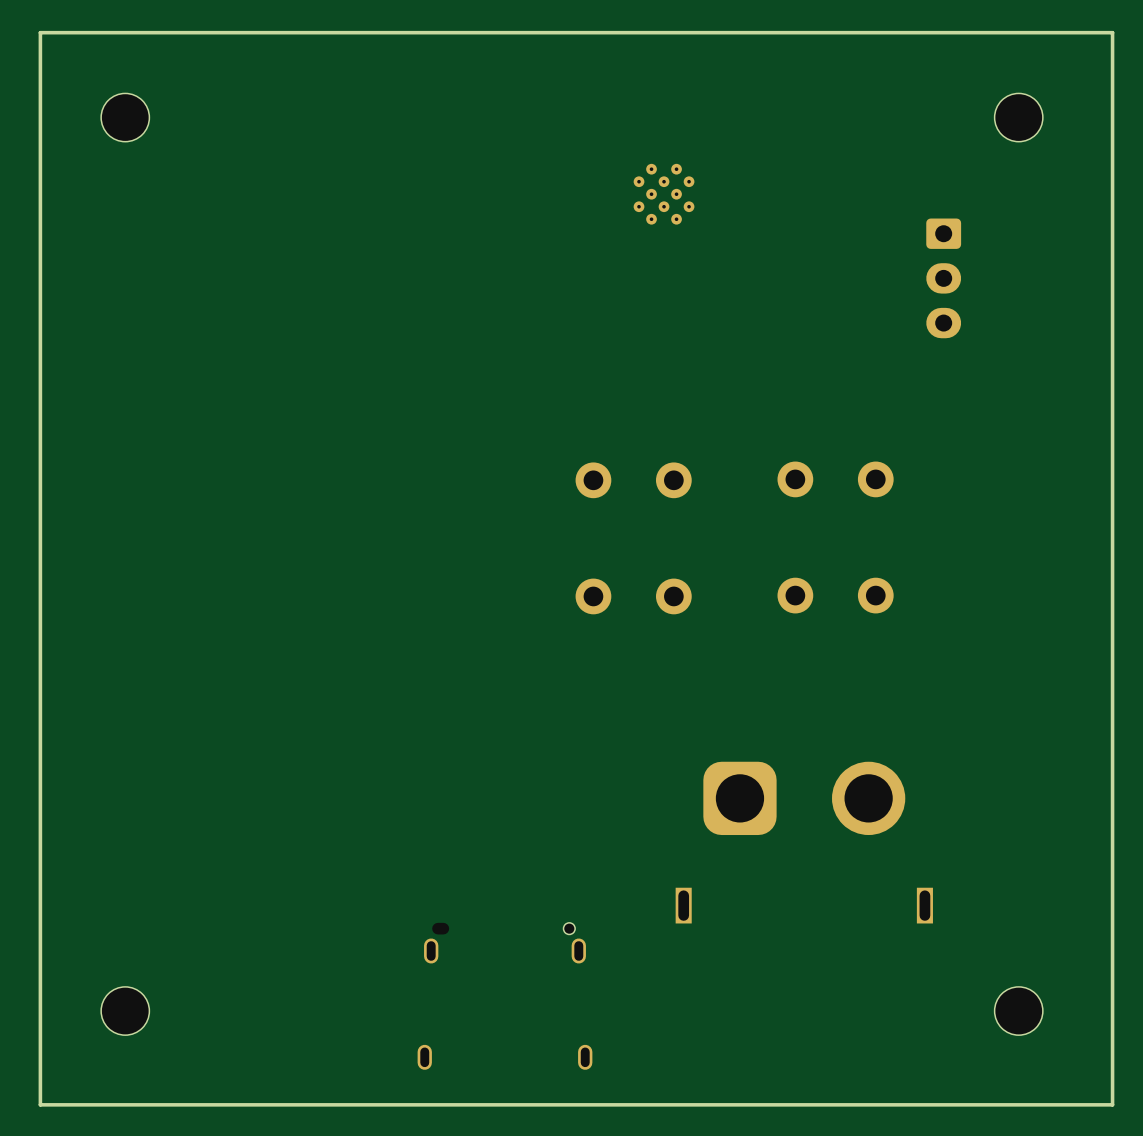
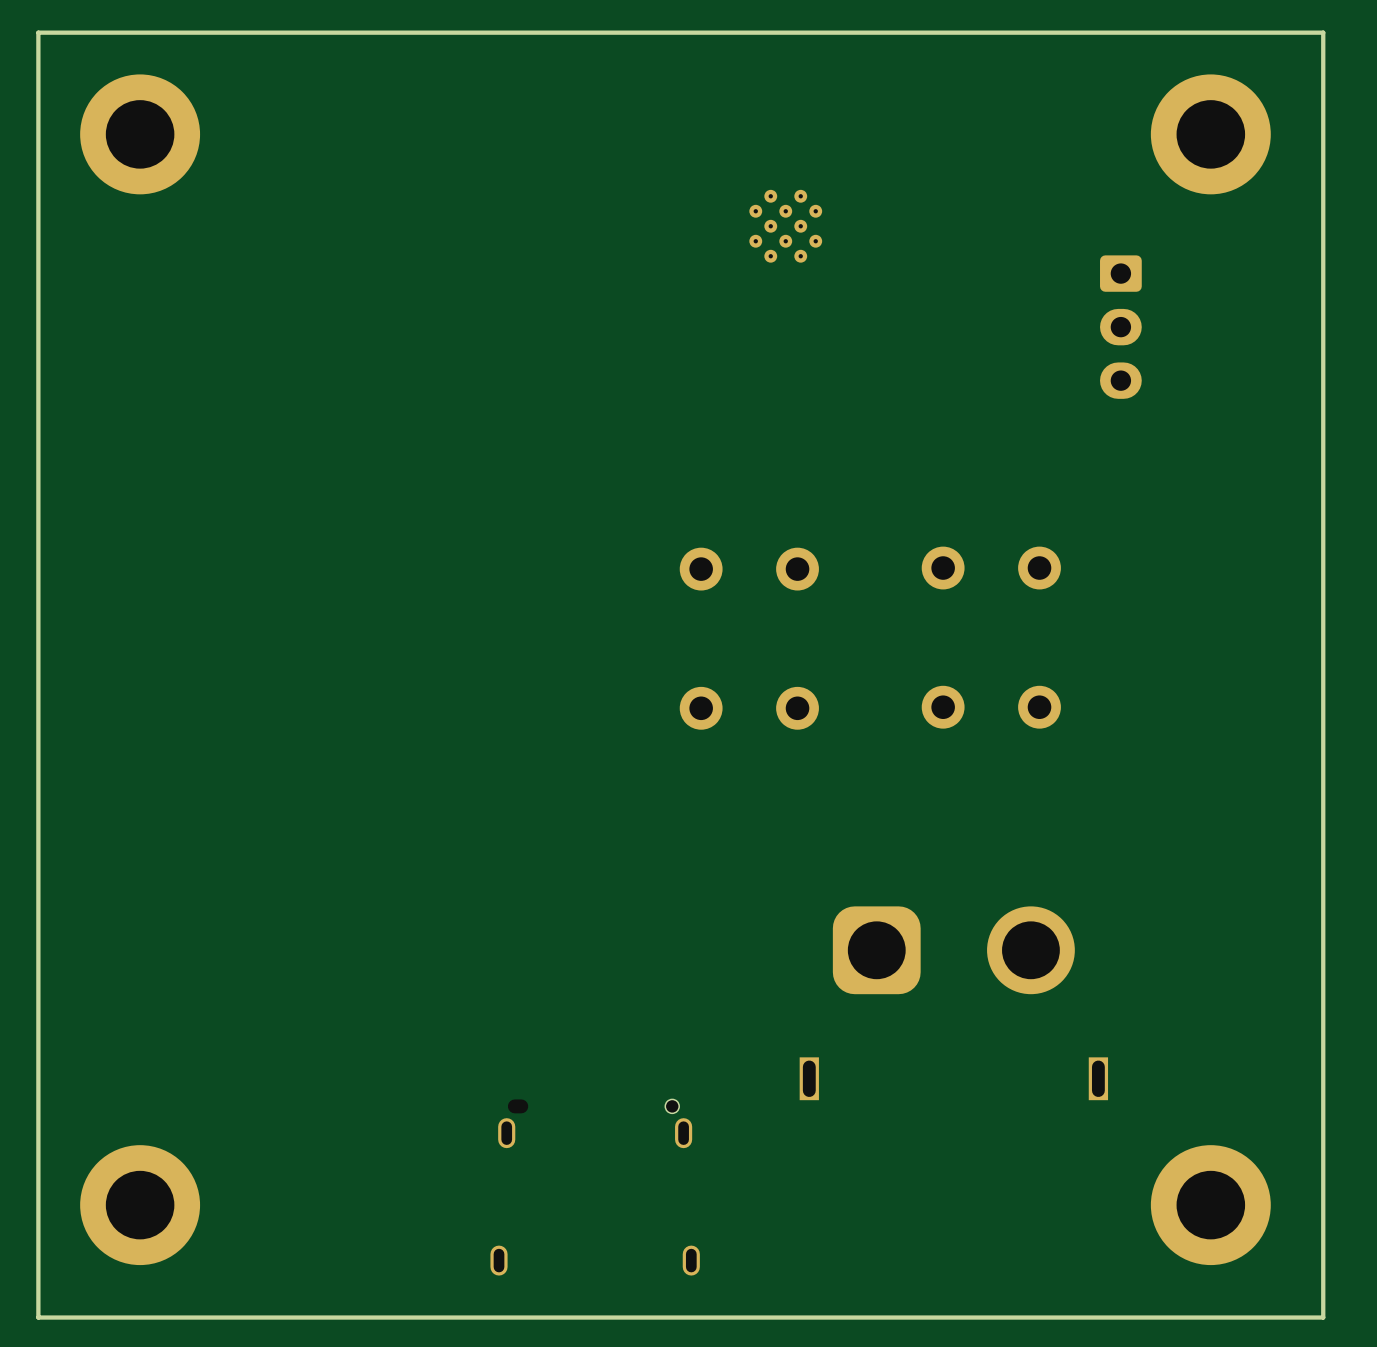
part footprint: [101, 93, 150, 142] -> [80, 74, 201, 195]
part footprint: [994, 93, 1043, 142] -> [1150, 74, 1271, 195]
part footprint: [101, 986, 150, 1036] -> [80, 1145, 201, 1266]
part footprint: [994, 986, 1043, 1036] -> [1150, 1145, 1271, 1266]

